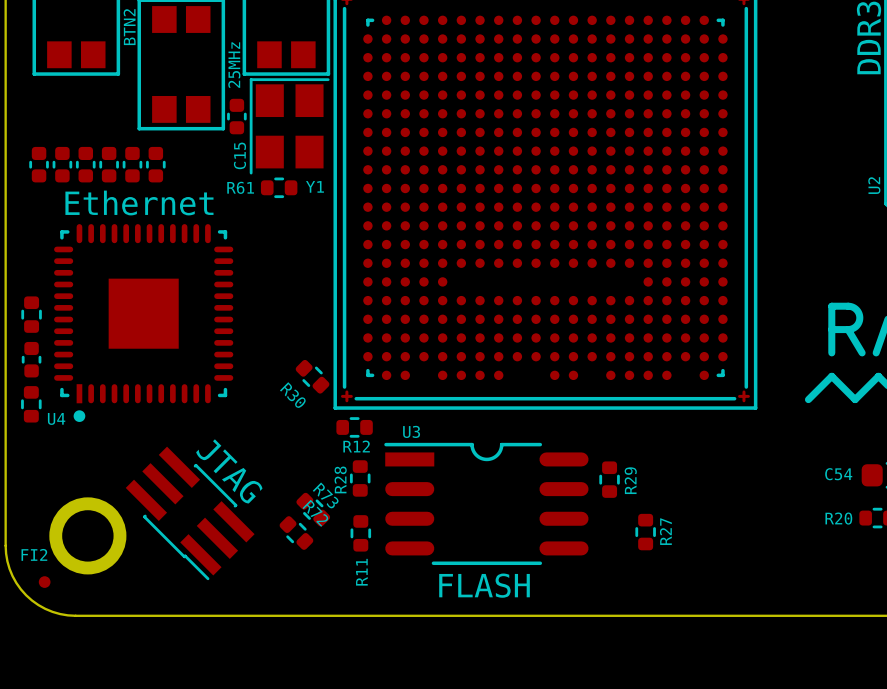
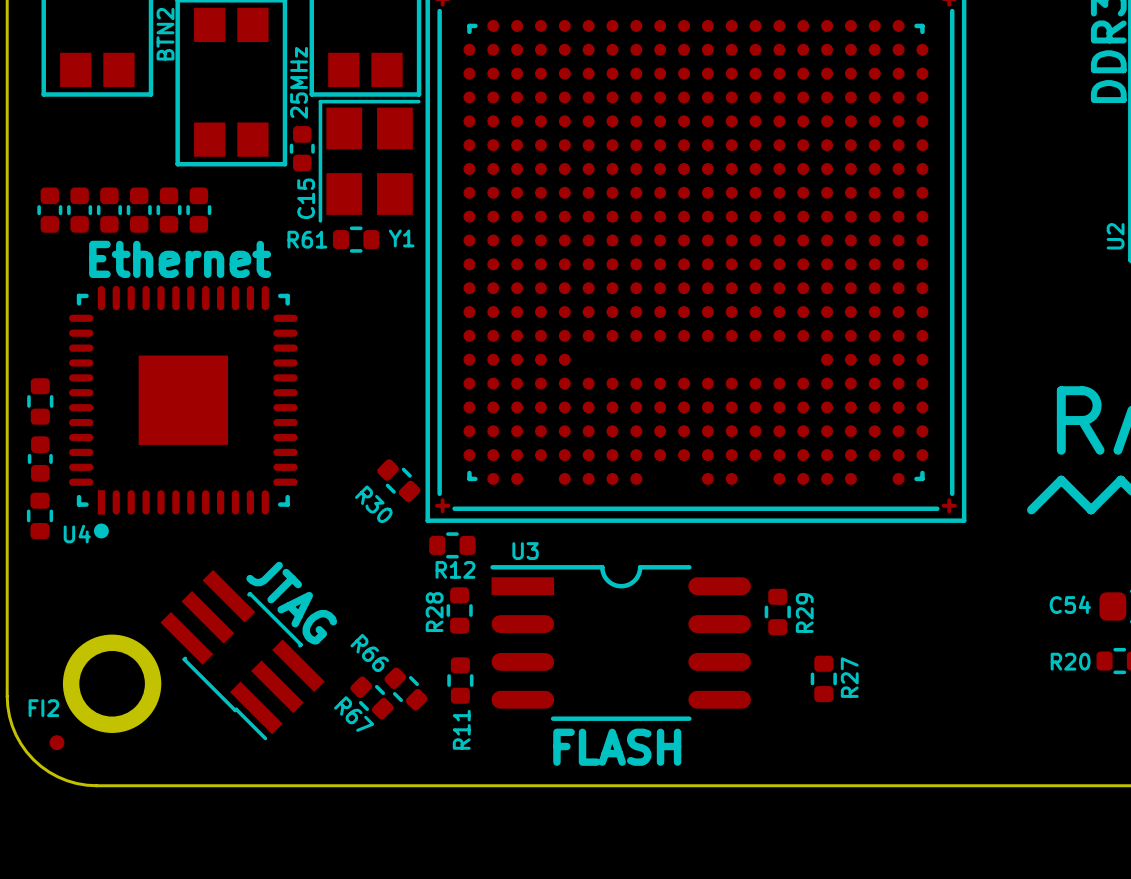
R73: (313, 509) -> none
R72: (296, 533) -> none
R66: none -> (405, 689)
R67: none -> (371, 697)

